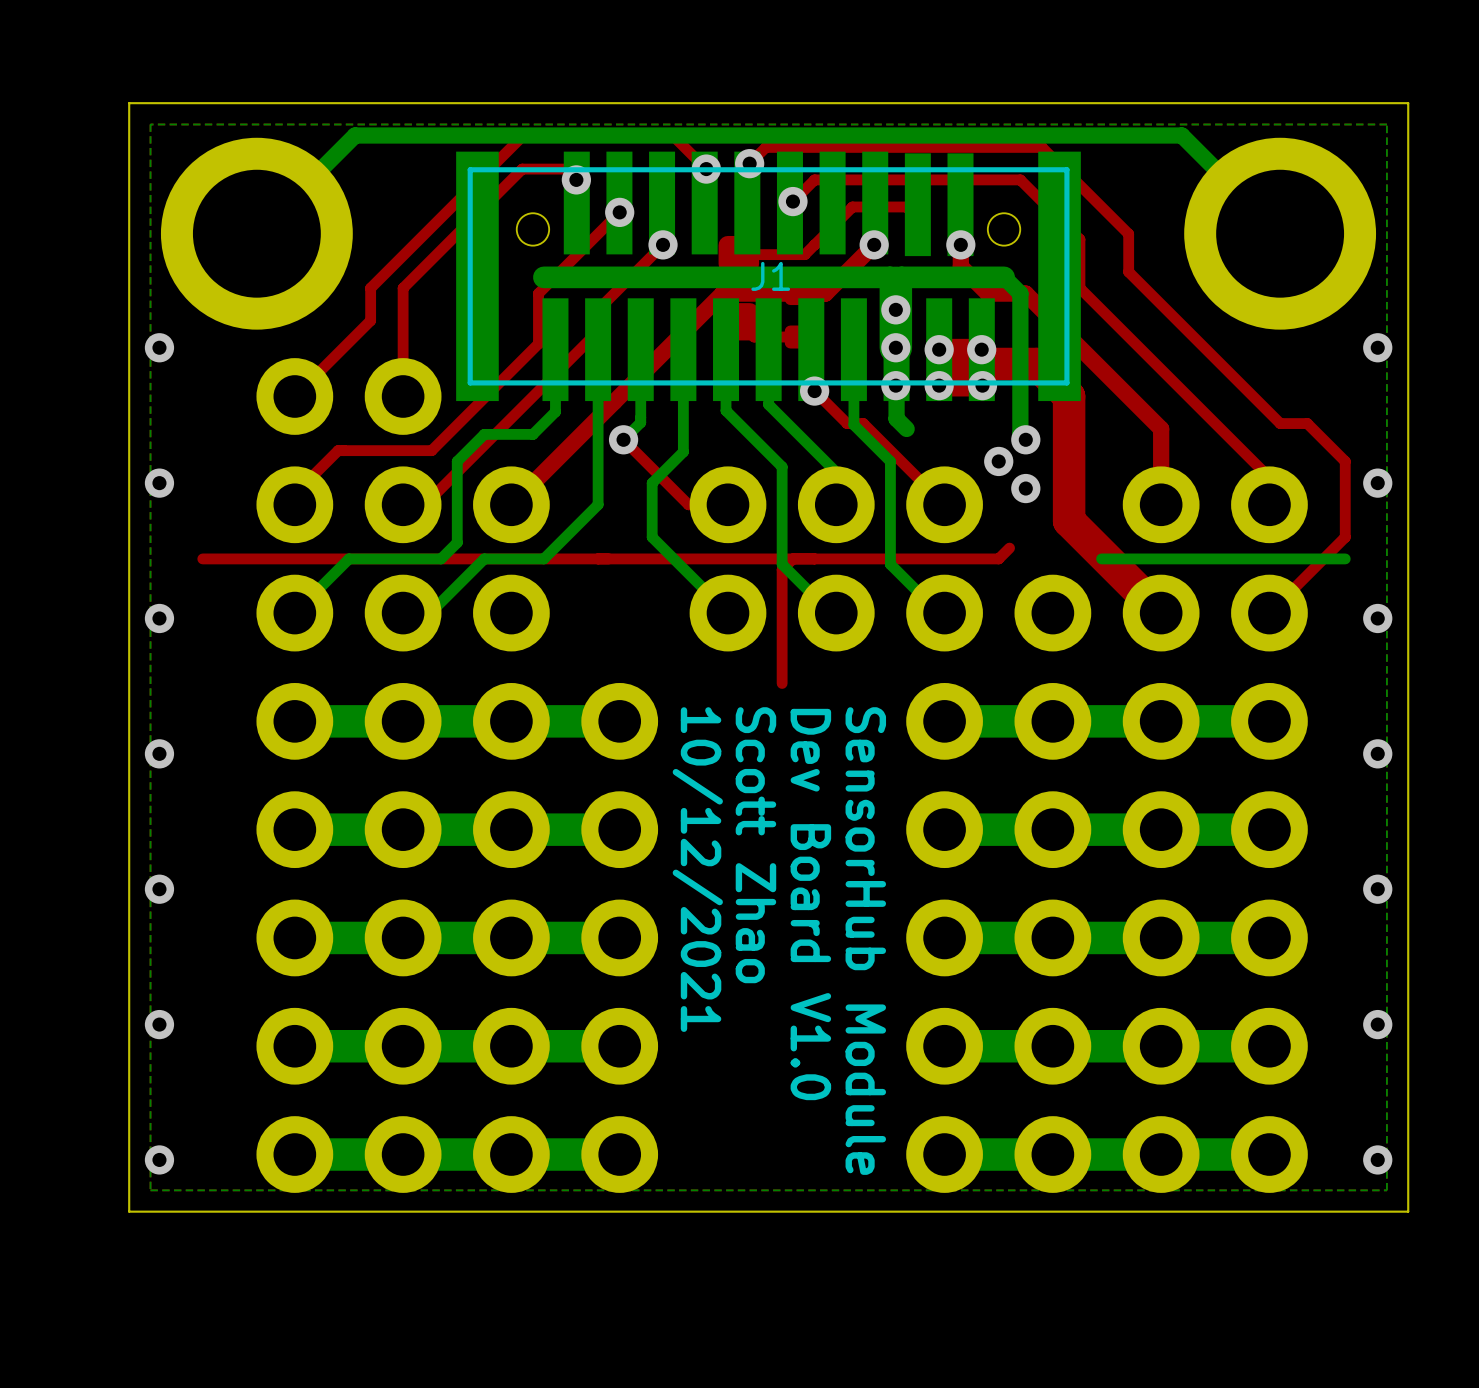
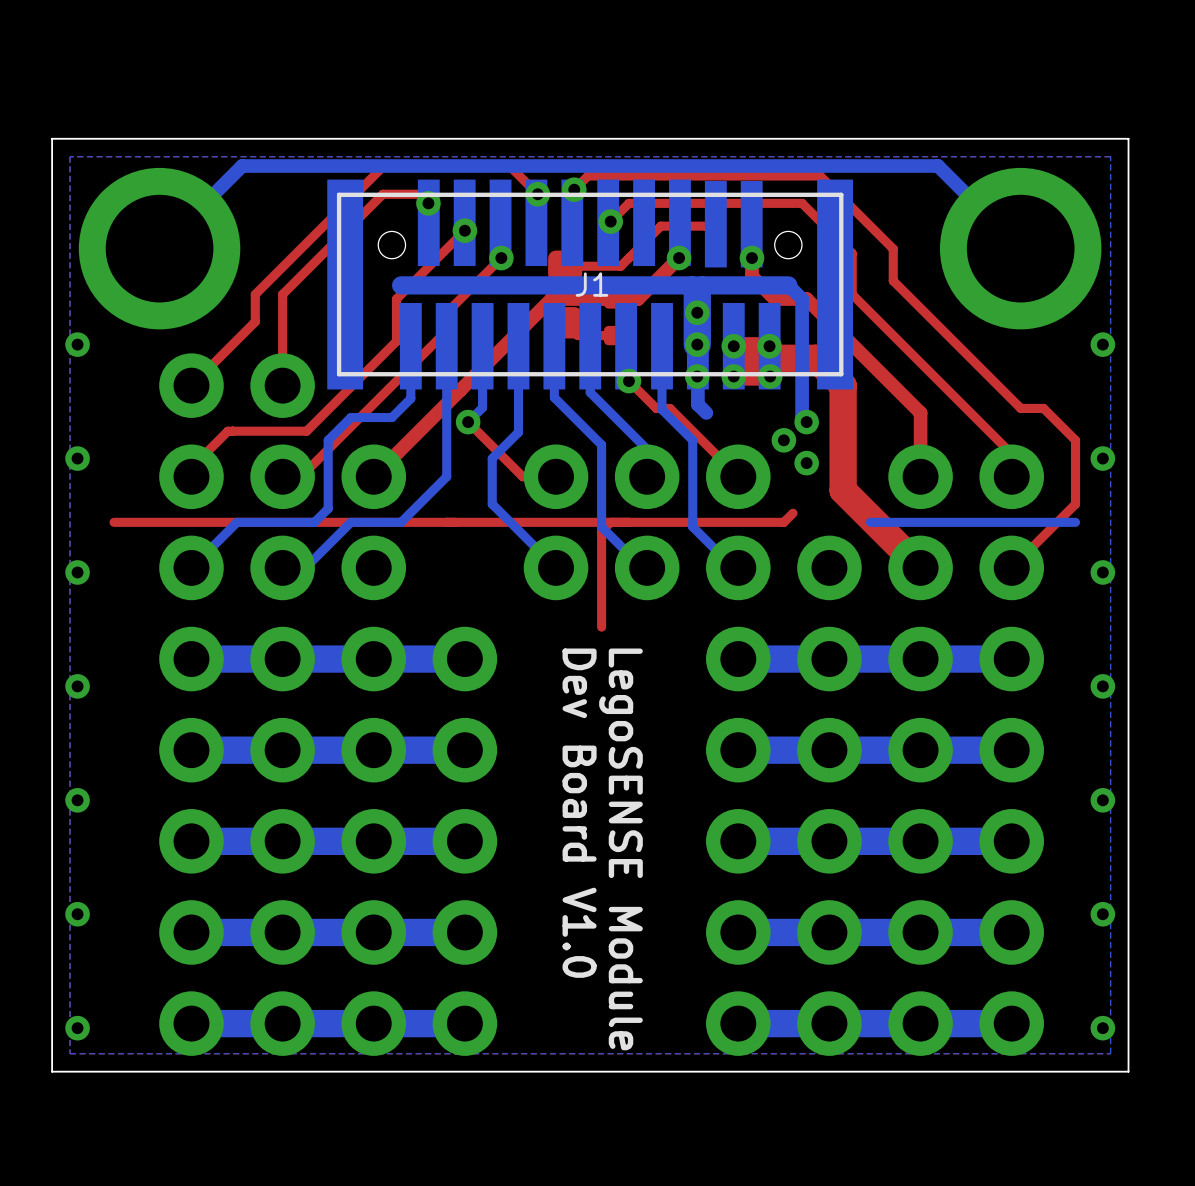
text: Scott Zhao (755, 845) -> Dev Board V1.0 (579, 813)
text: 10/12/2021 (697, 869) -> none
text: Dev Board V1.0 (810, 904) -> LegoSENSE Module (621, 849)
text: SensorHub Module (865, 941) -> none

